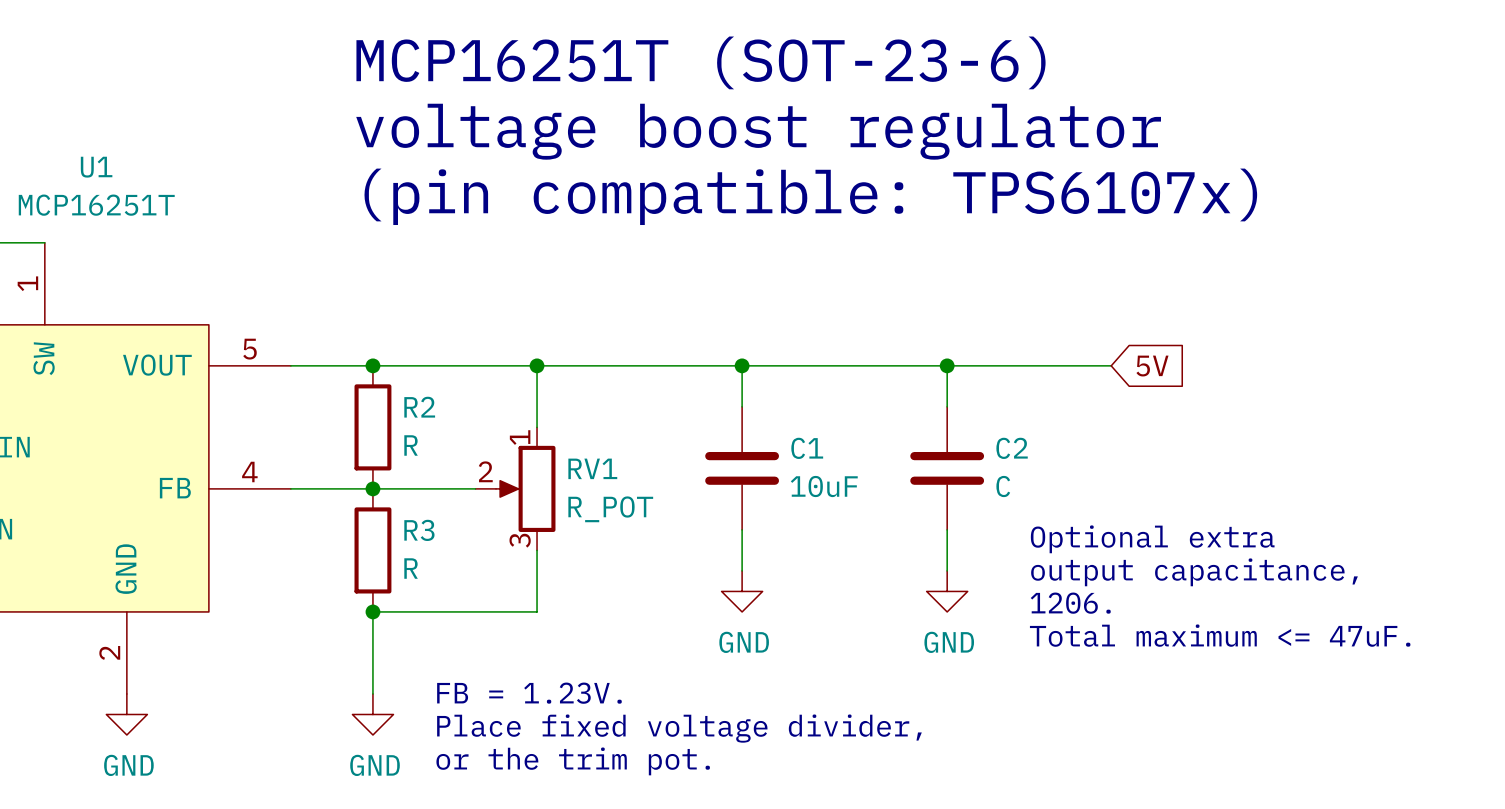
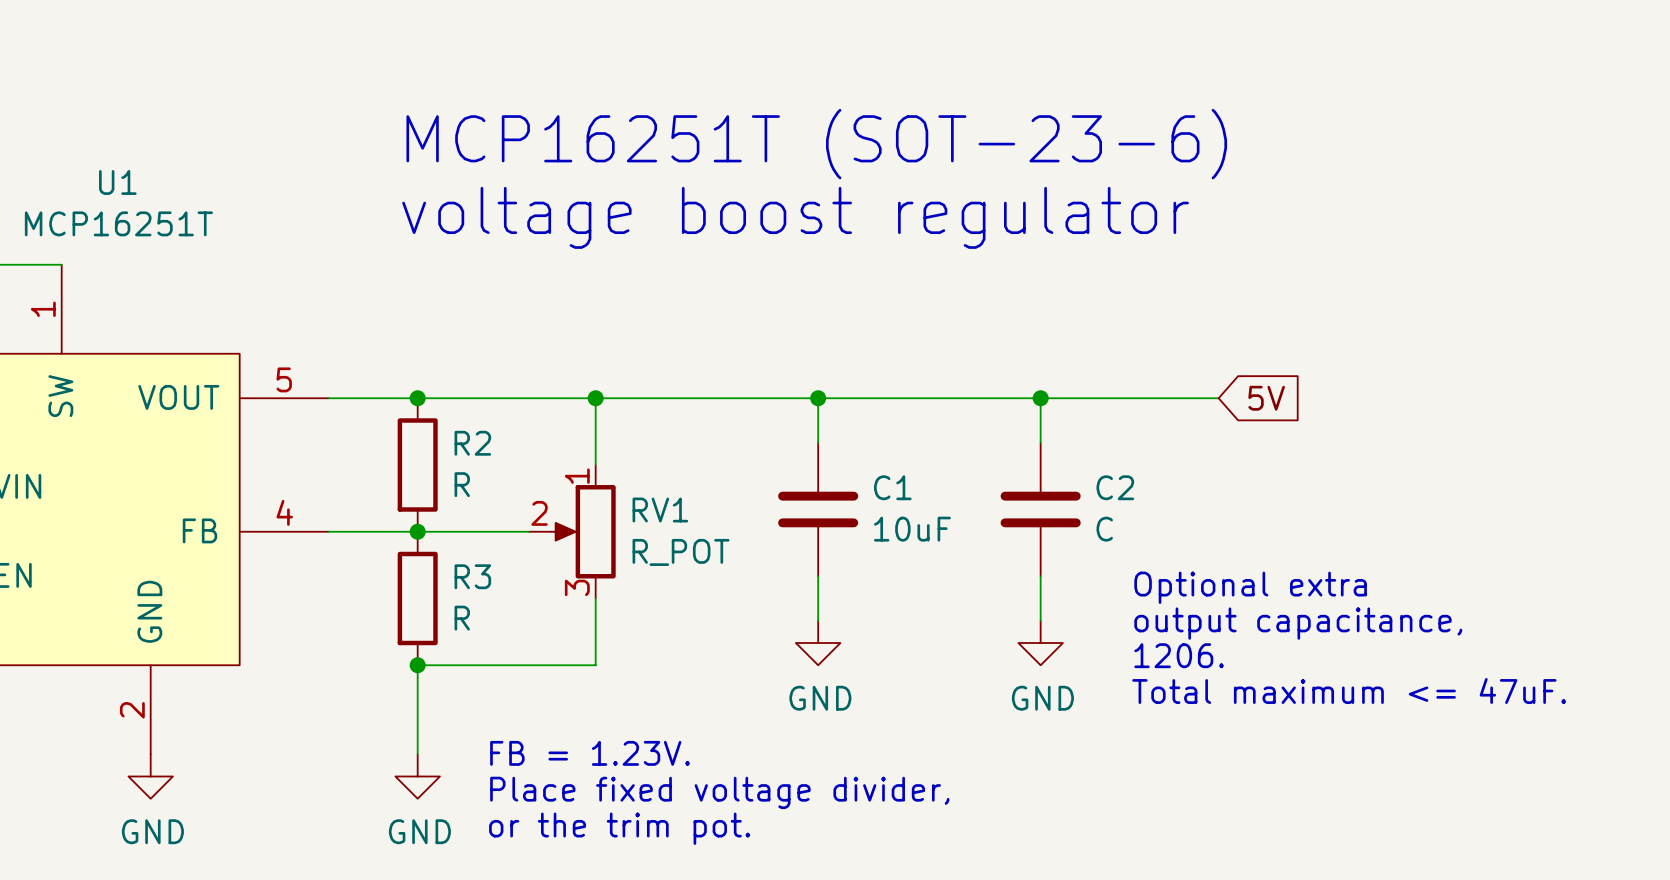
text: MCP16251T (SOT-23-6) (701, 62) -> none
text: voltage boost regulator (758, 131) -> MCP16251T (SOT-23-6) (816, 144)
text: (pin compatible: TPS6107x) (810, 196) -> voltage boost regulator (795, 217)

